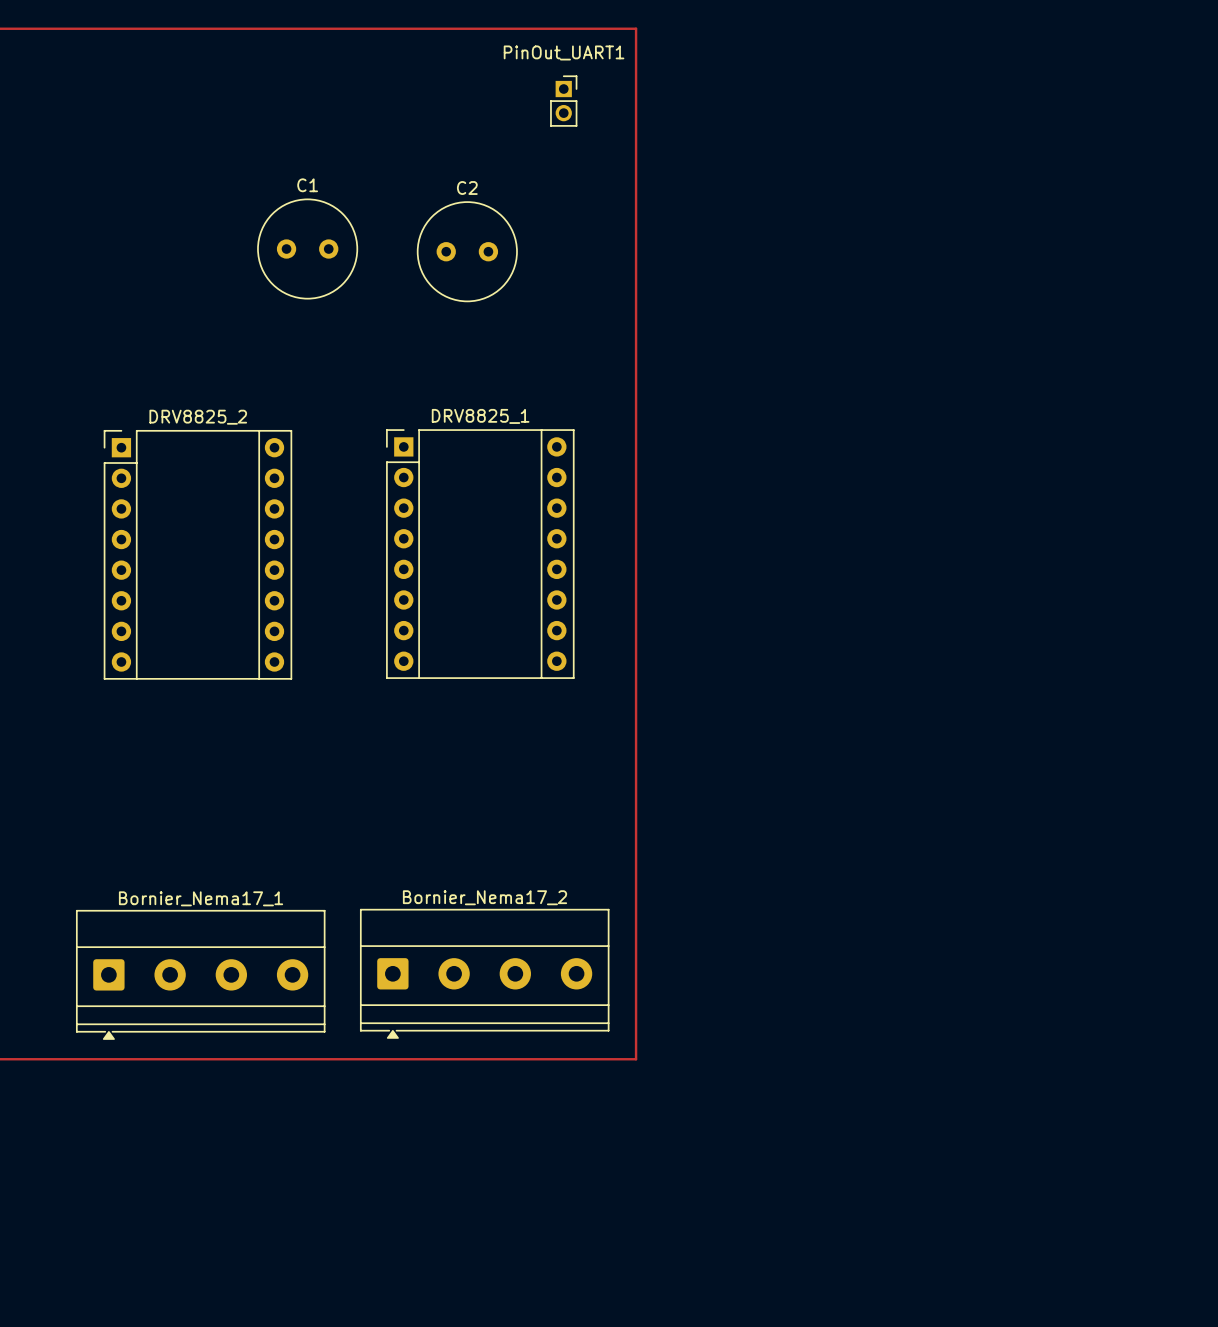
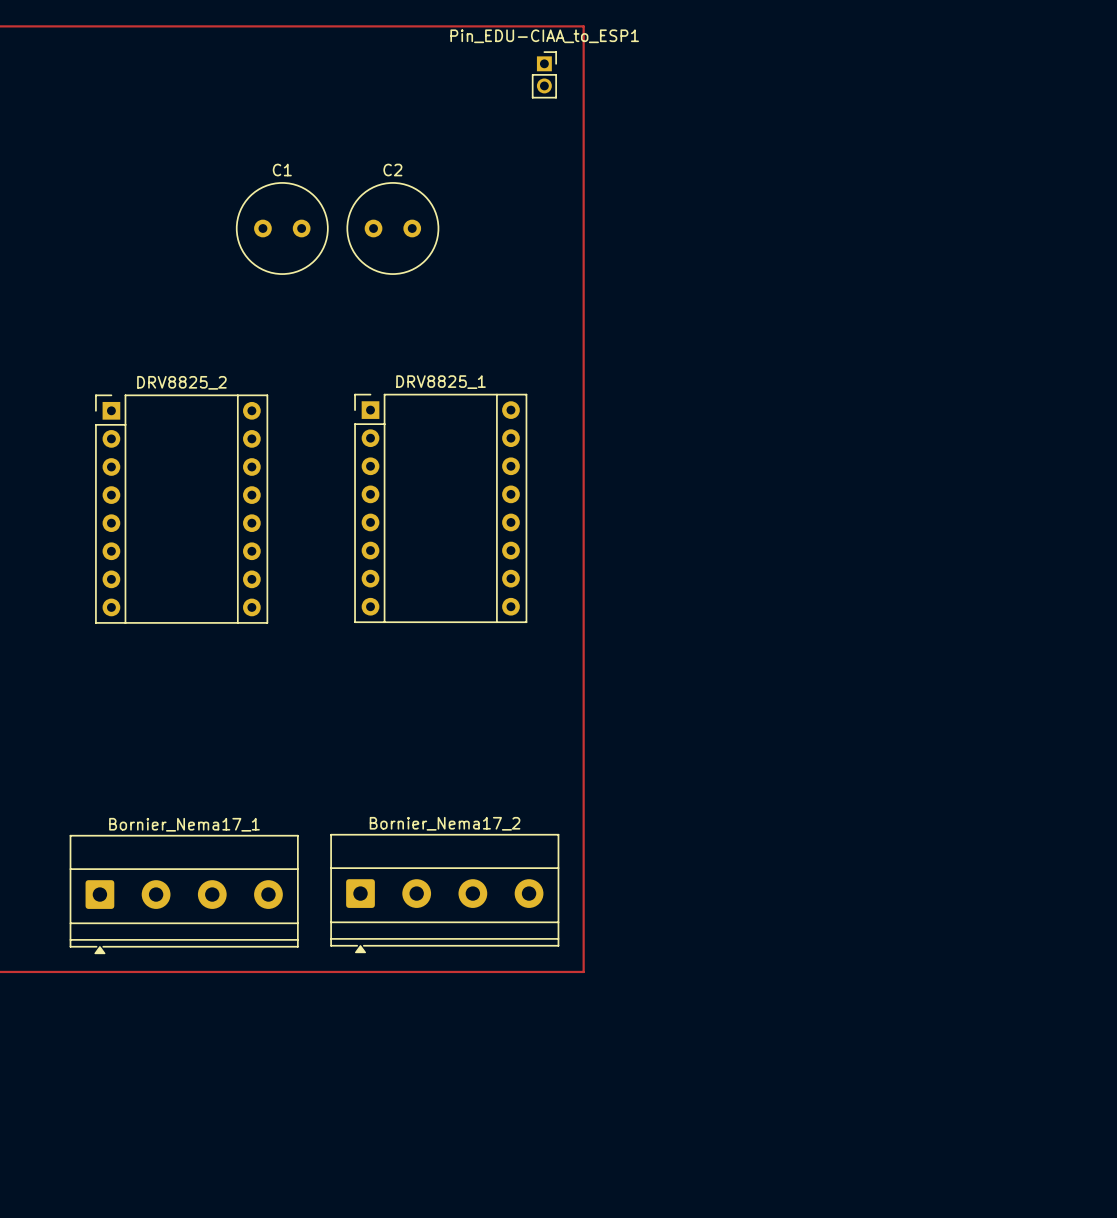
Pin_EDU-CIAA_to_ESP1: none -> (544, 74)
PinOut_UART1: (563, 101) -> none
C2 position: (467, 251) -> (392, 228)

